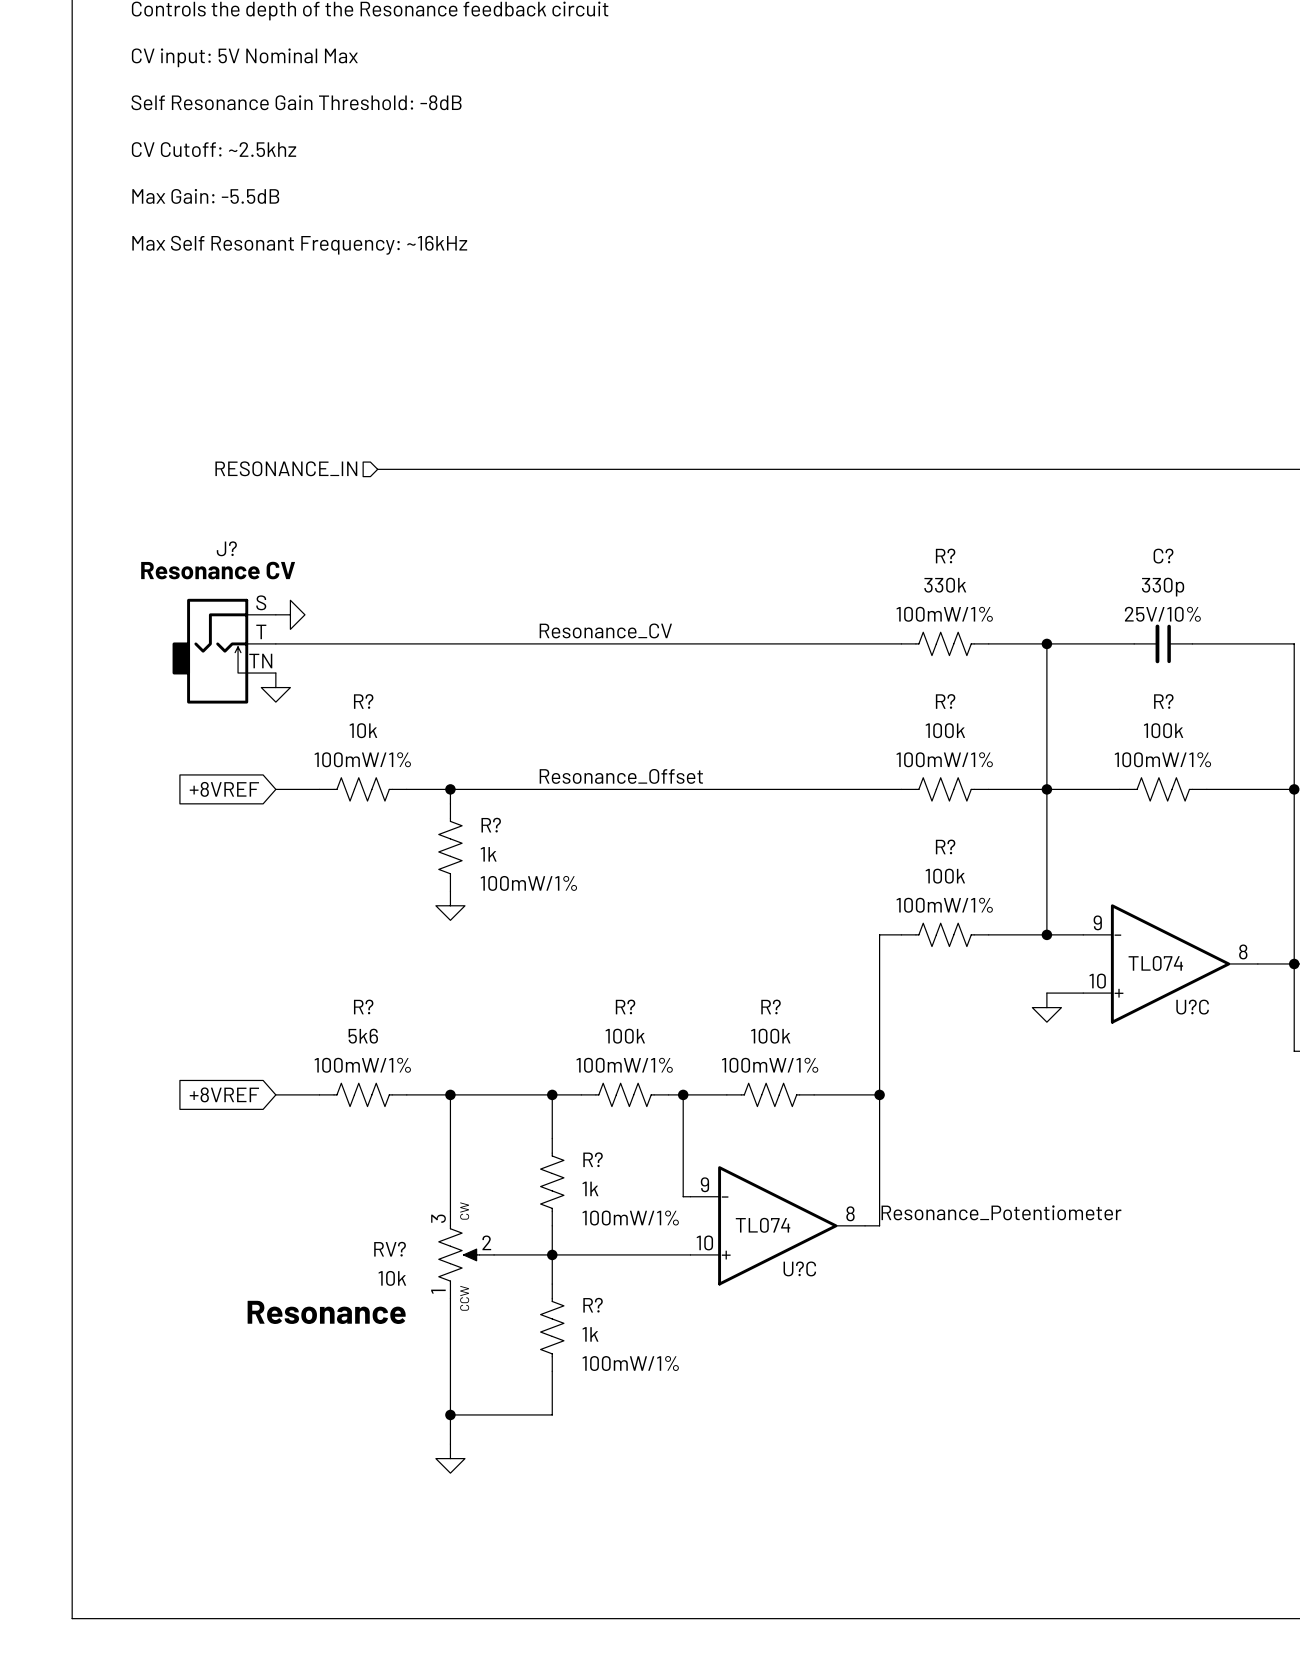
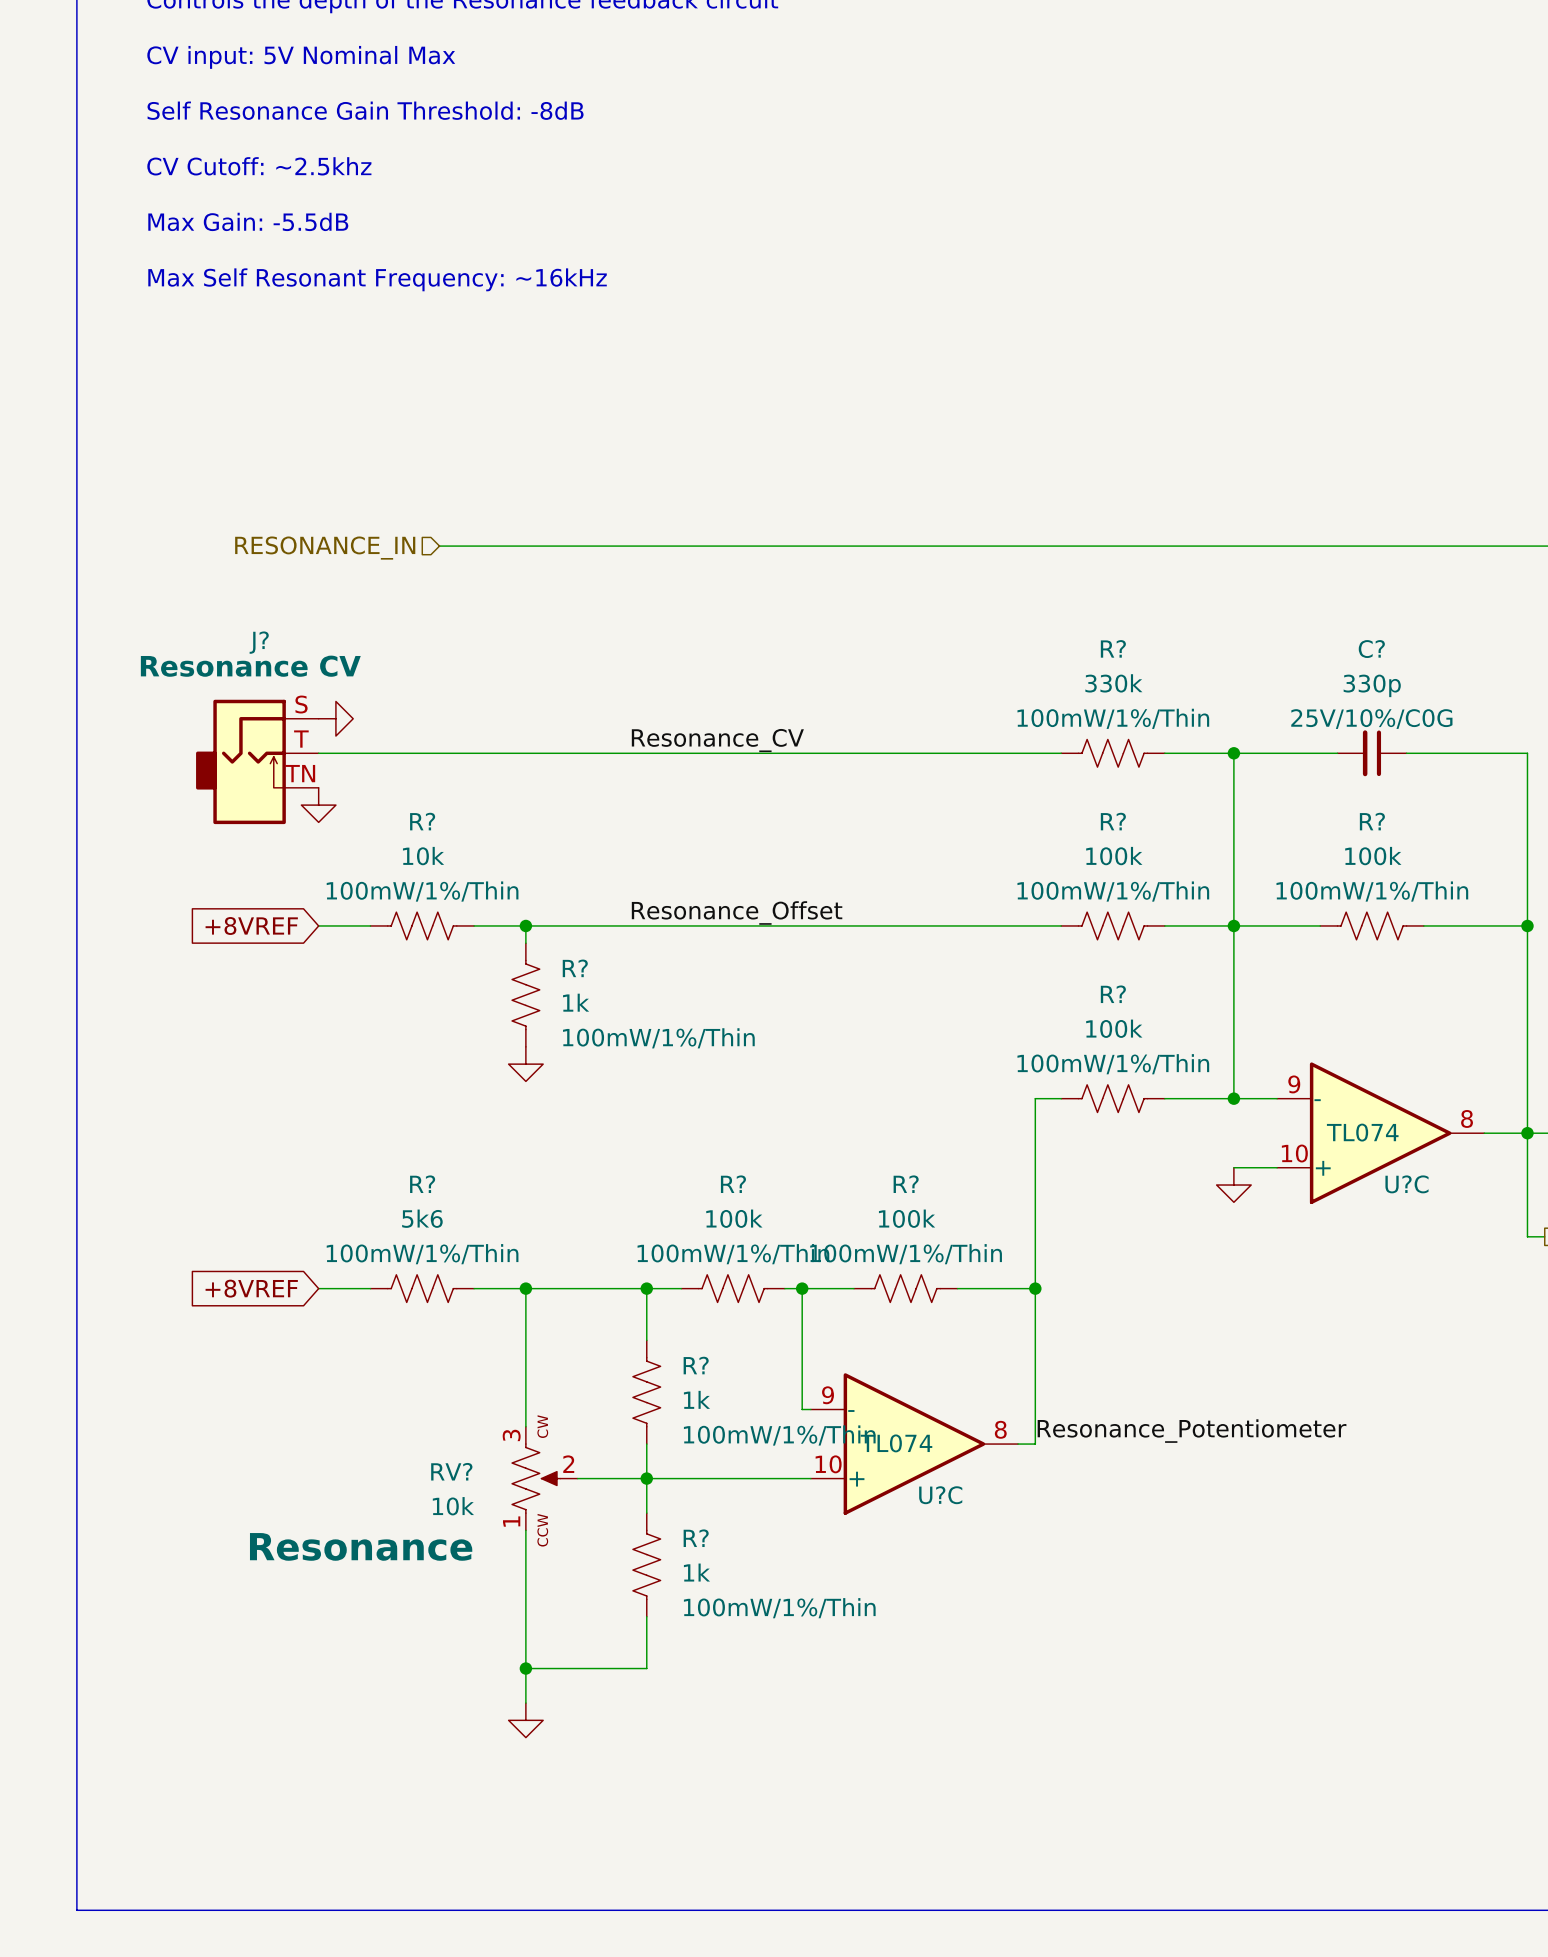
R? text: 100mW/1% (944, 614) -> 100mW/1%/Thin (1113, 718)
C? text: 25V/10% (1162, 614) -> 25V/10%/C0G (1371, 719)
R? text: 100mW/1% (362, 759) -> 100mW/1%/Thin (422, 891)
R? text: 100mW/1% (944, 759) -> 100mW/1%/Thin (1113, 891)
R? text: 100mW/1% (1162, 759) -> 100mW/1%/Thin (1372, 891)
R? text: 100mW/1% (528, 883) -> 100mW/1%/Thin (658, 1038)
R? text: 100mW/1% (944, 905) -> 100mW/1%/Thin (1113, 1064)
R? text: 100mW/1% (362, 1065) -> 100mW/1%/Thin (422, 1254)
R? text: 100mW/1% (624, 1065) -> 100mW/1%/Thin (733, 1254)
R? text: 100mW/1% (770, 1065) -> 100mW/1%/Thin (906, 1254)
R? text: 100mW/1% (630, 1218) -> 100mW/1%/Thin (779, 1435)
R? text: 100mW/1% (630, 1363) -> 100mW/1%/Thin (779, 1608)

